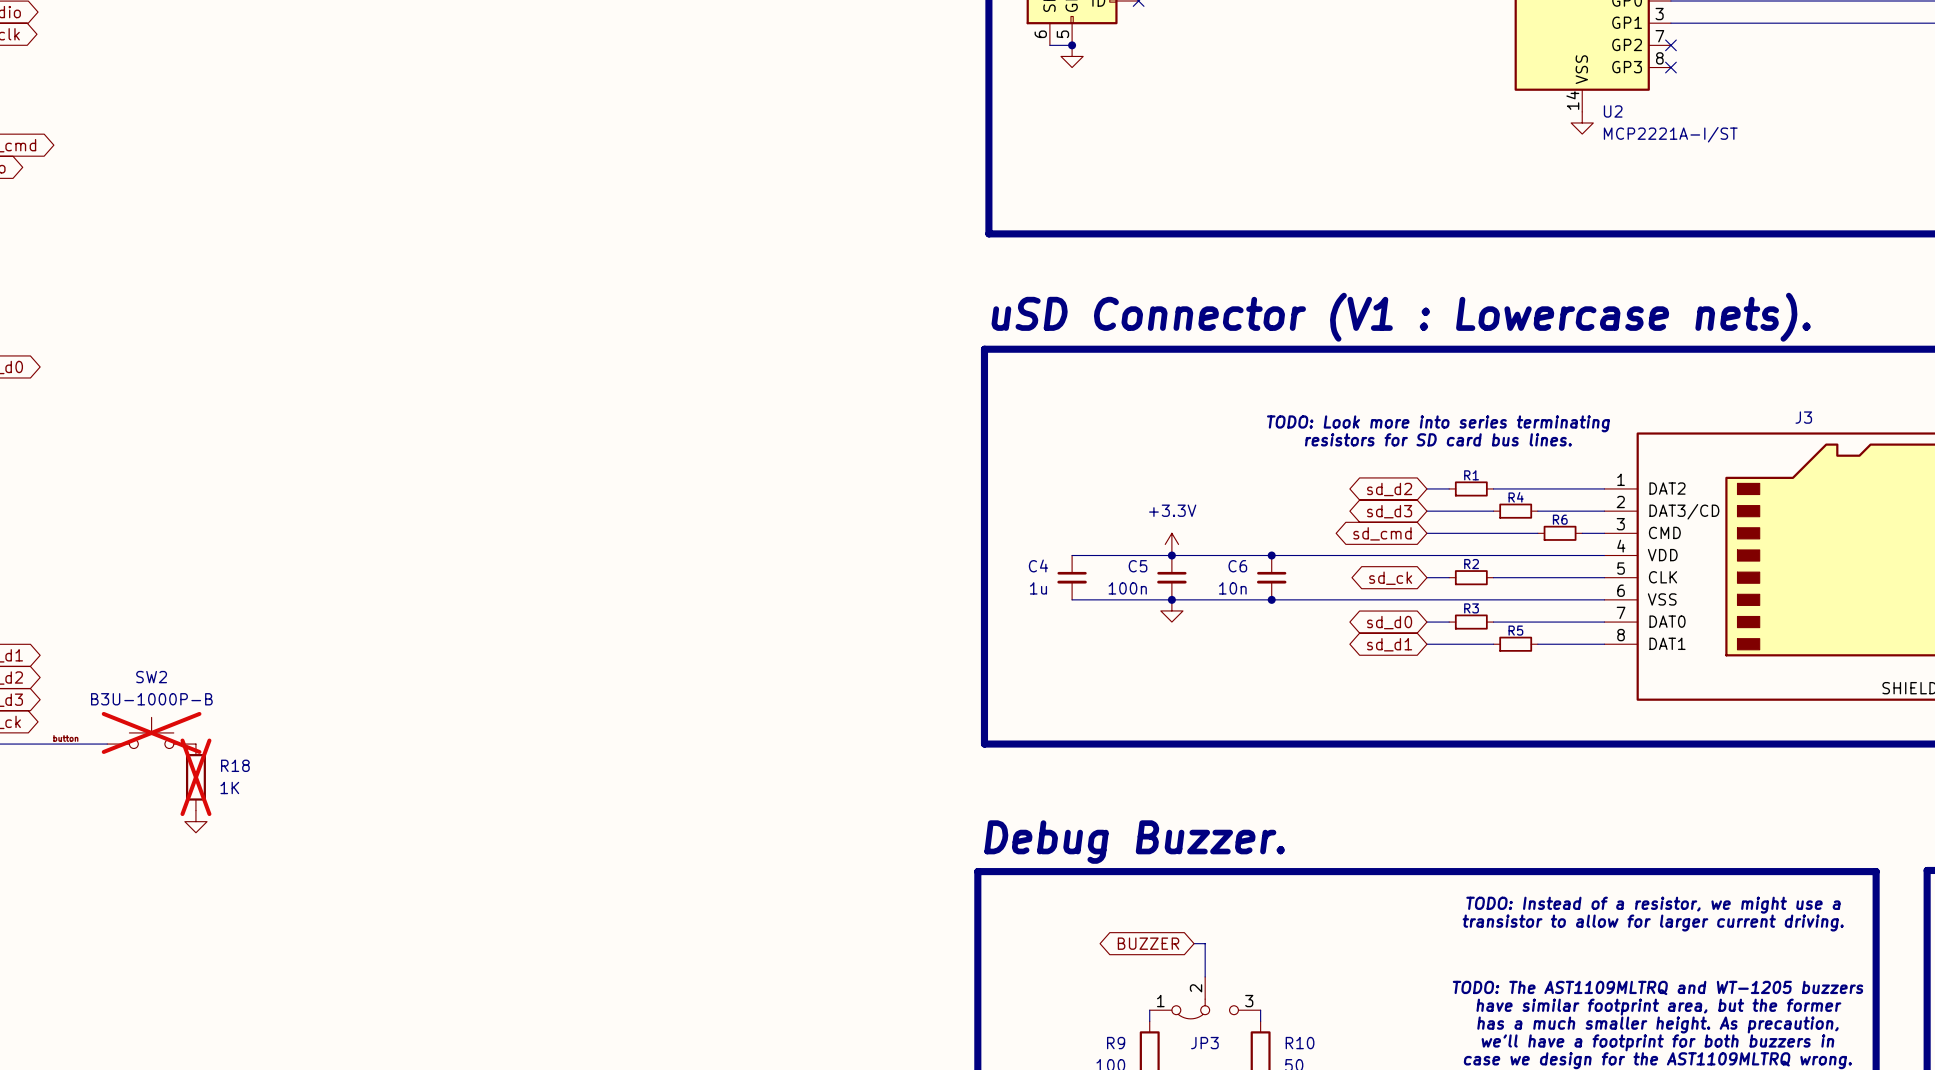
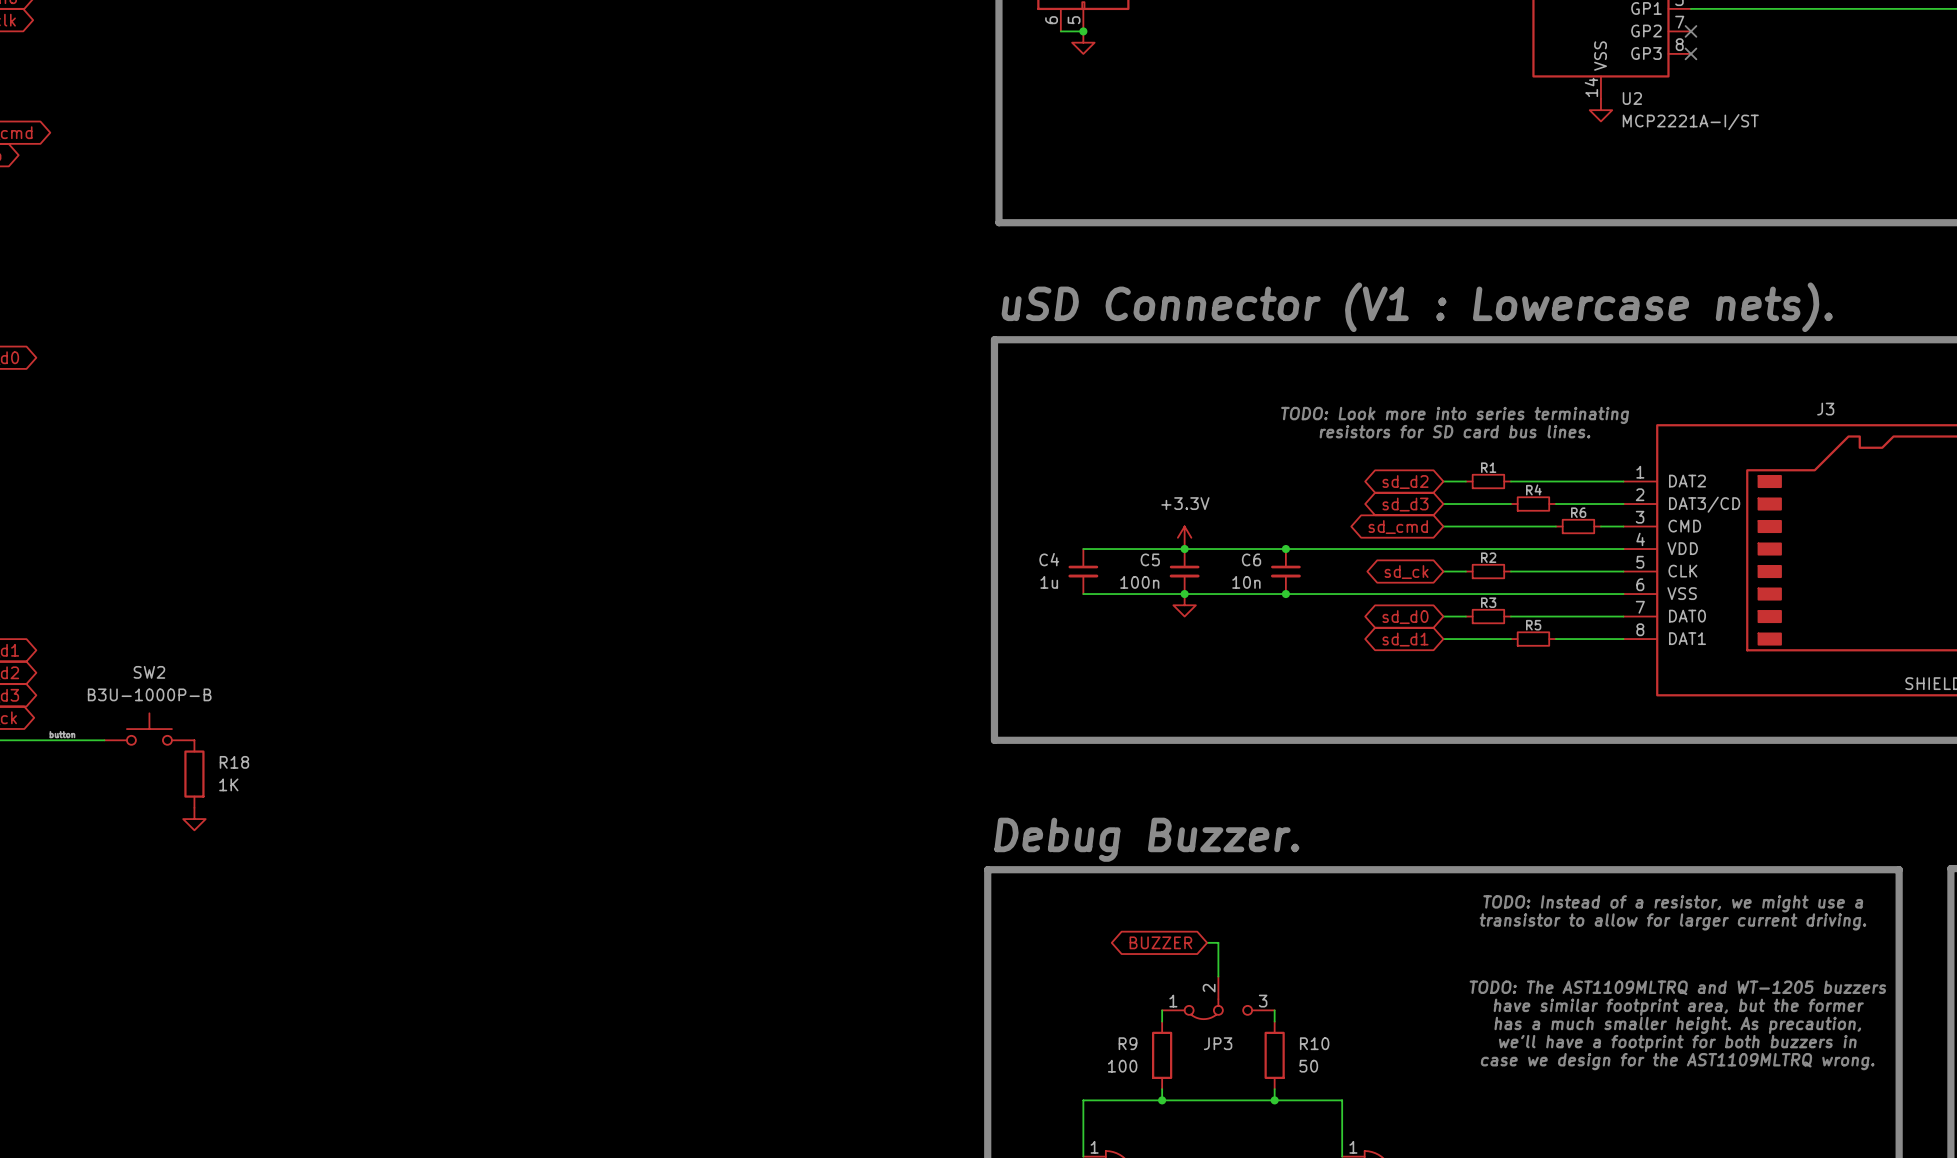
SW2 do-not-place cross: (151, 732) -> none
R18 do-not-place cross: (195, 777) -> none

